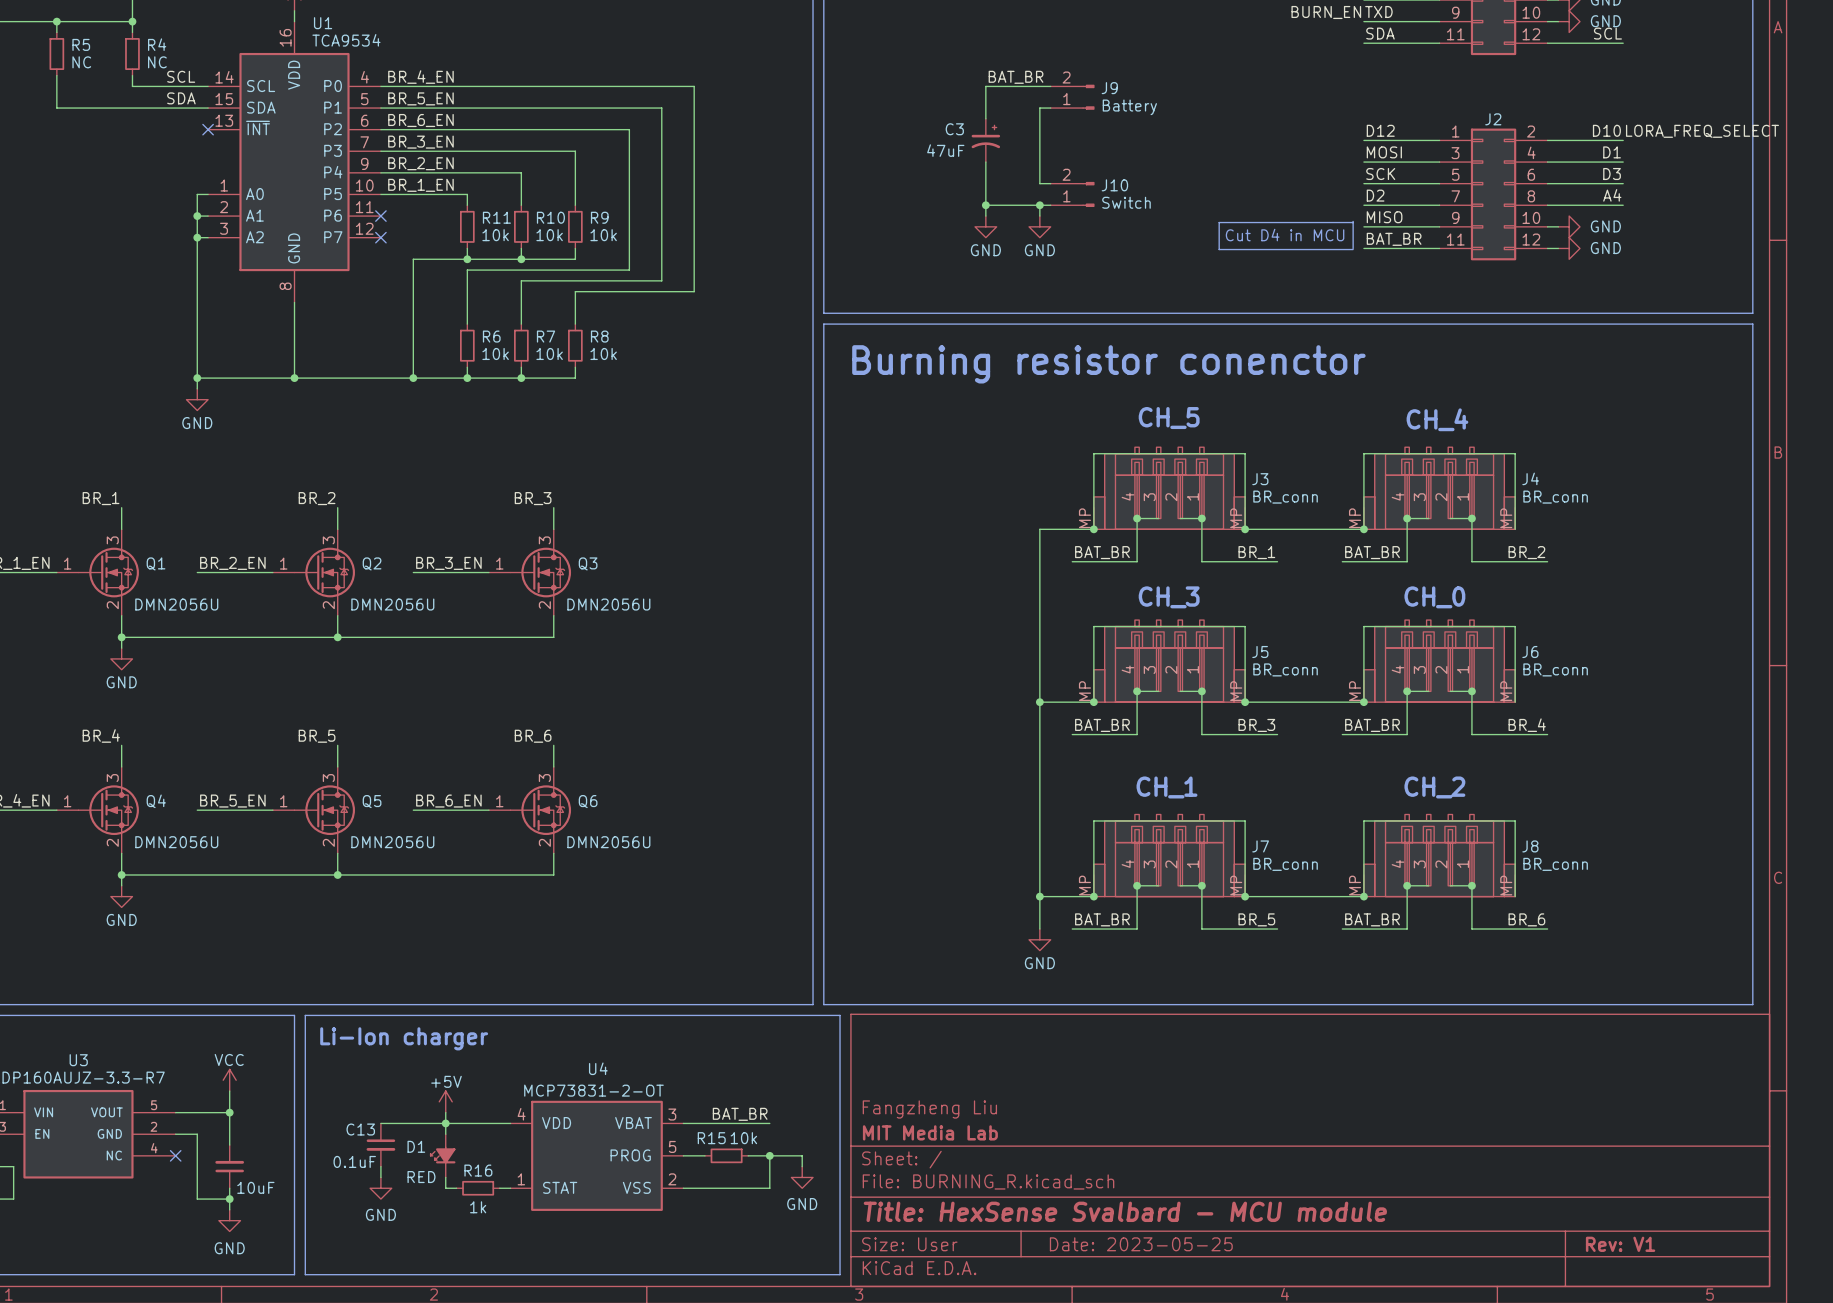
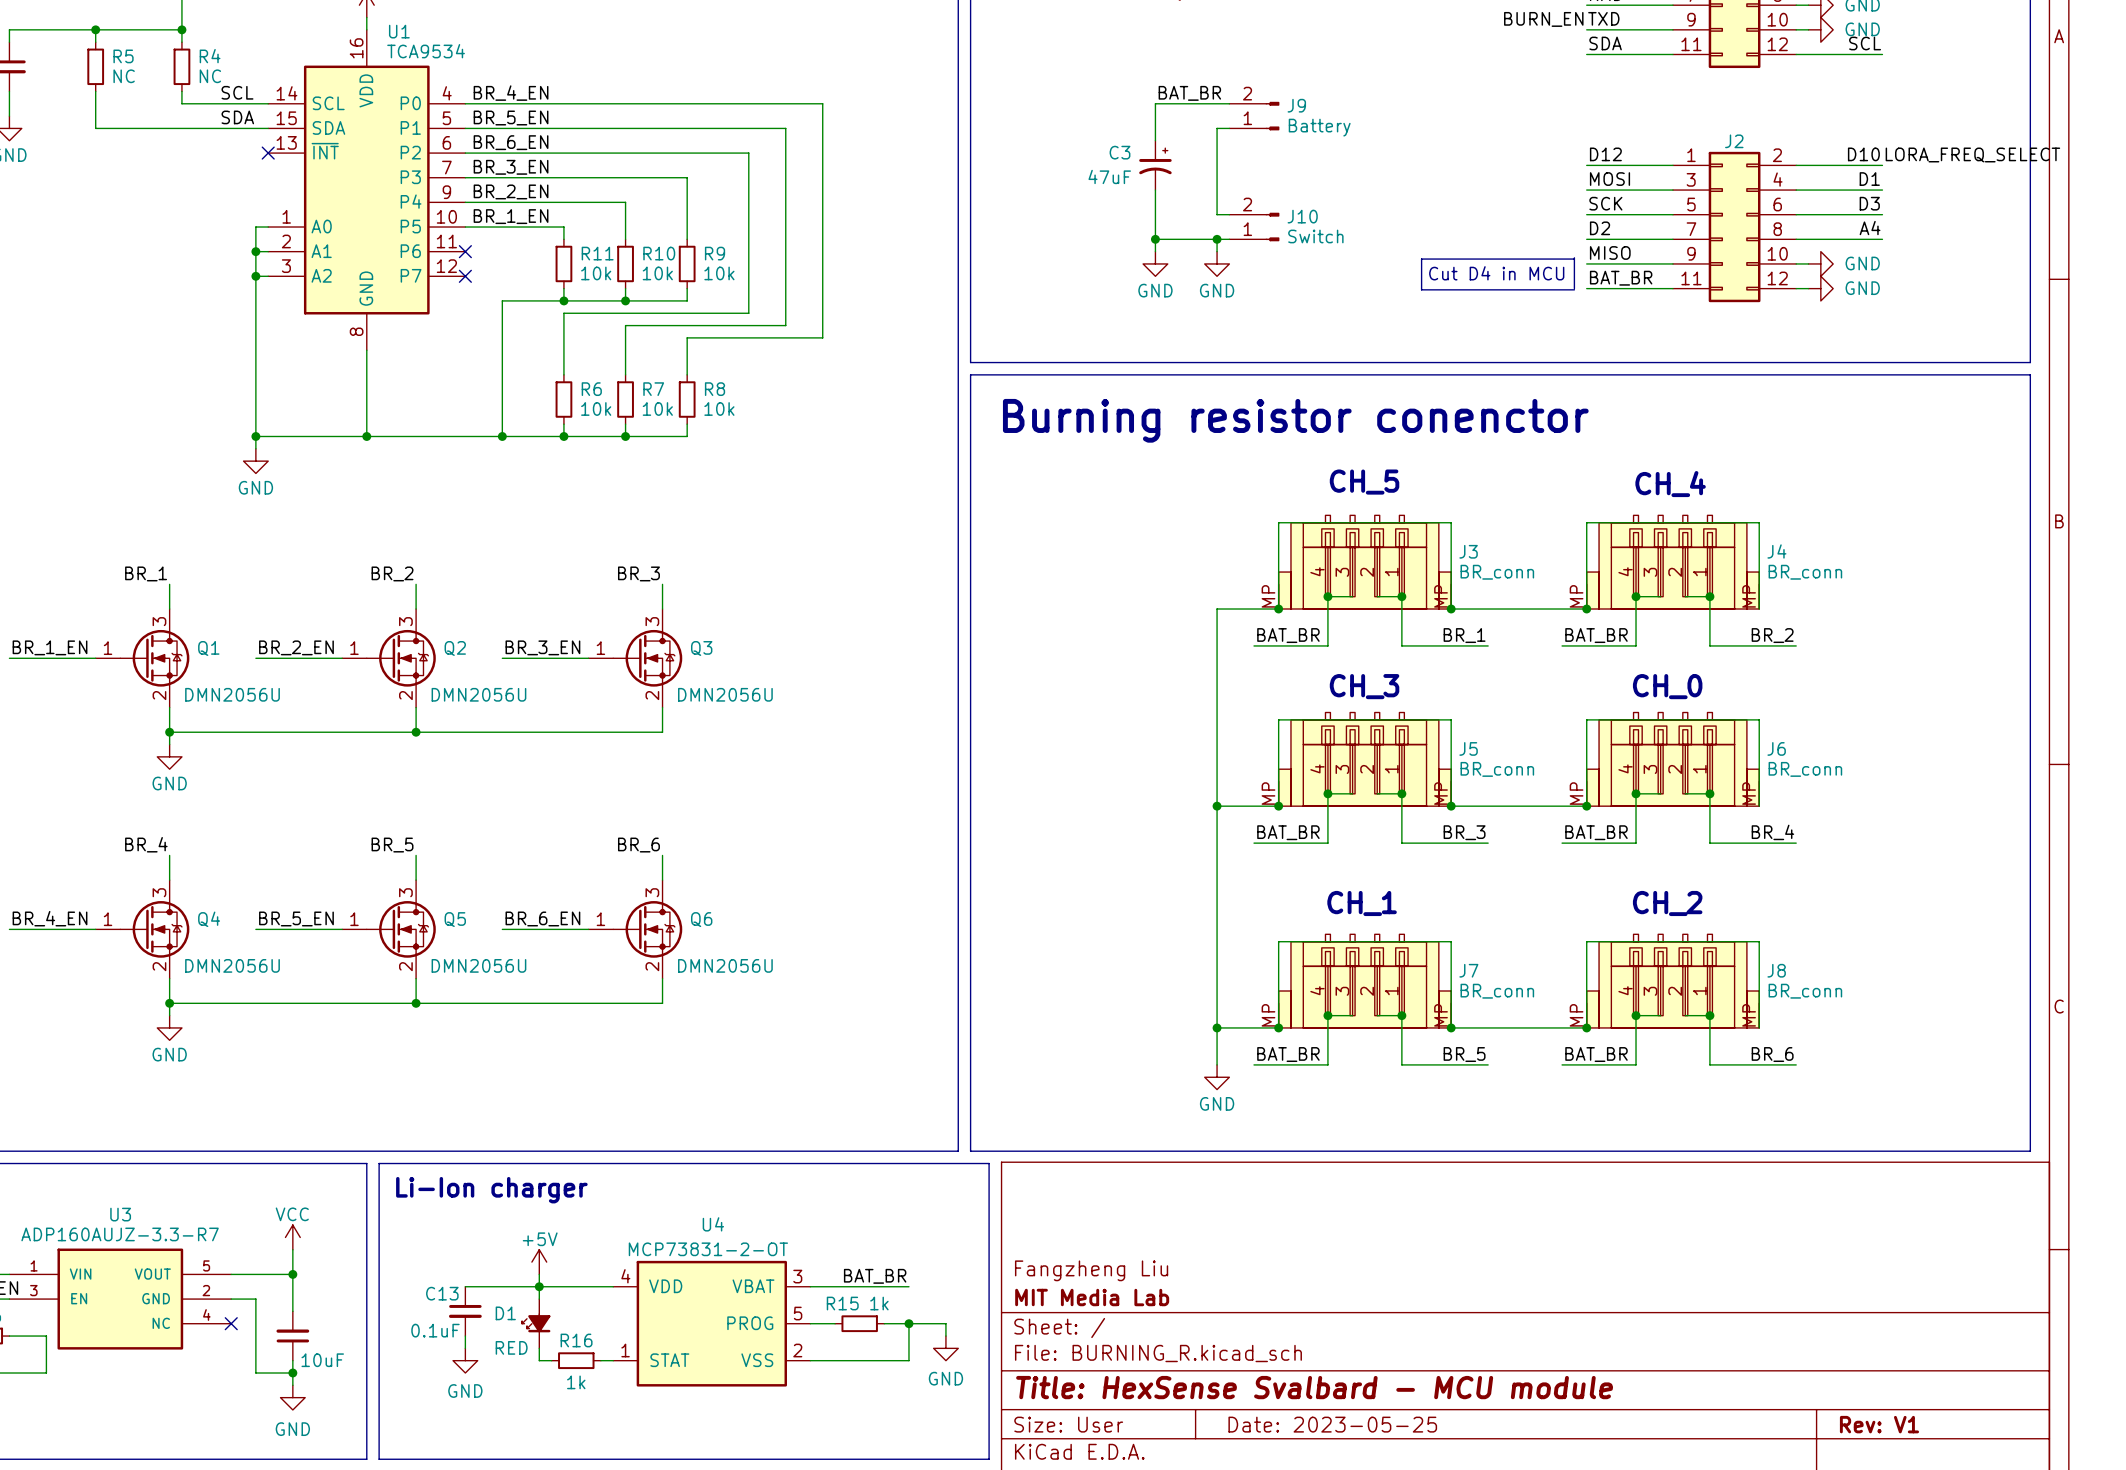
R15 value: 10k (743, 1138) -> 1k (879, 1303)

